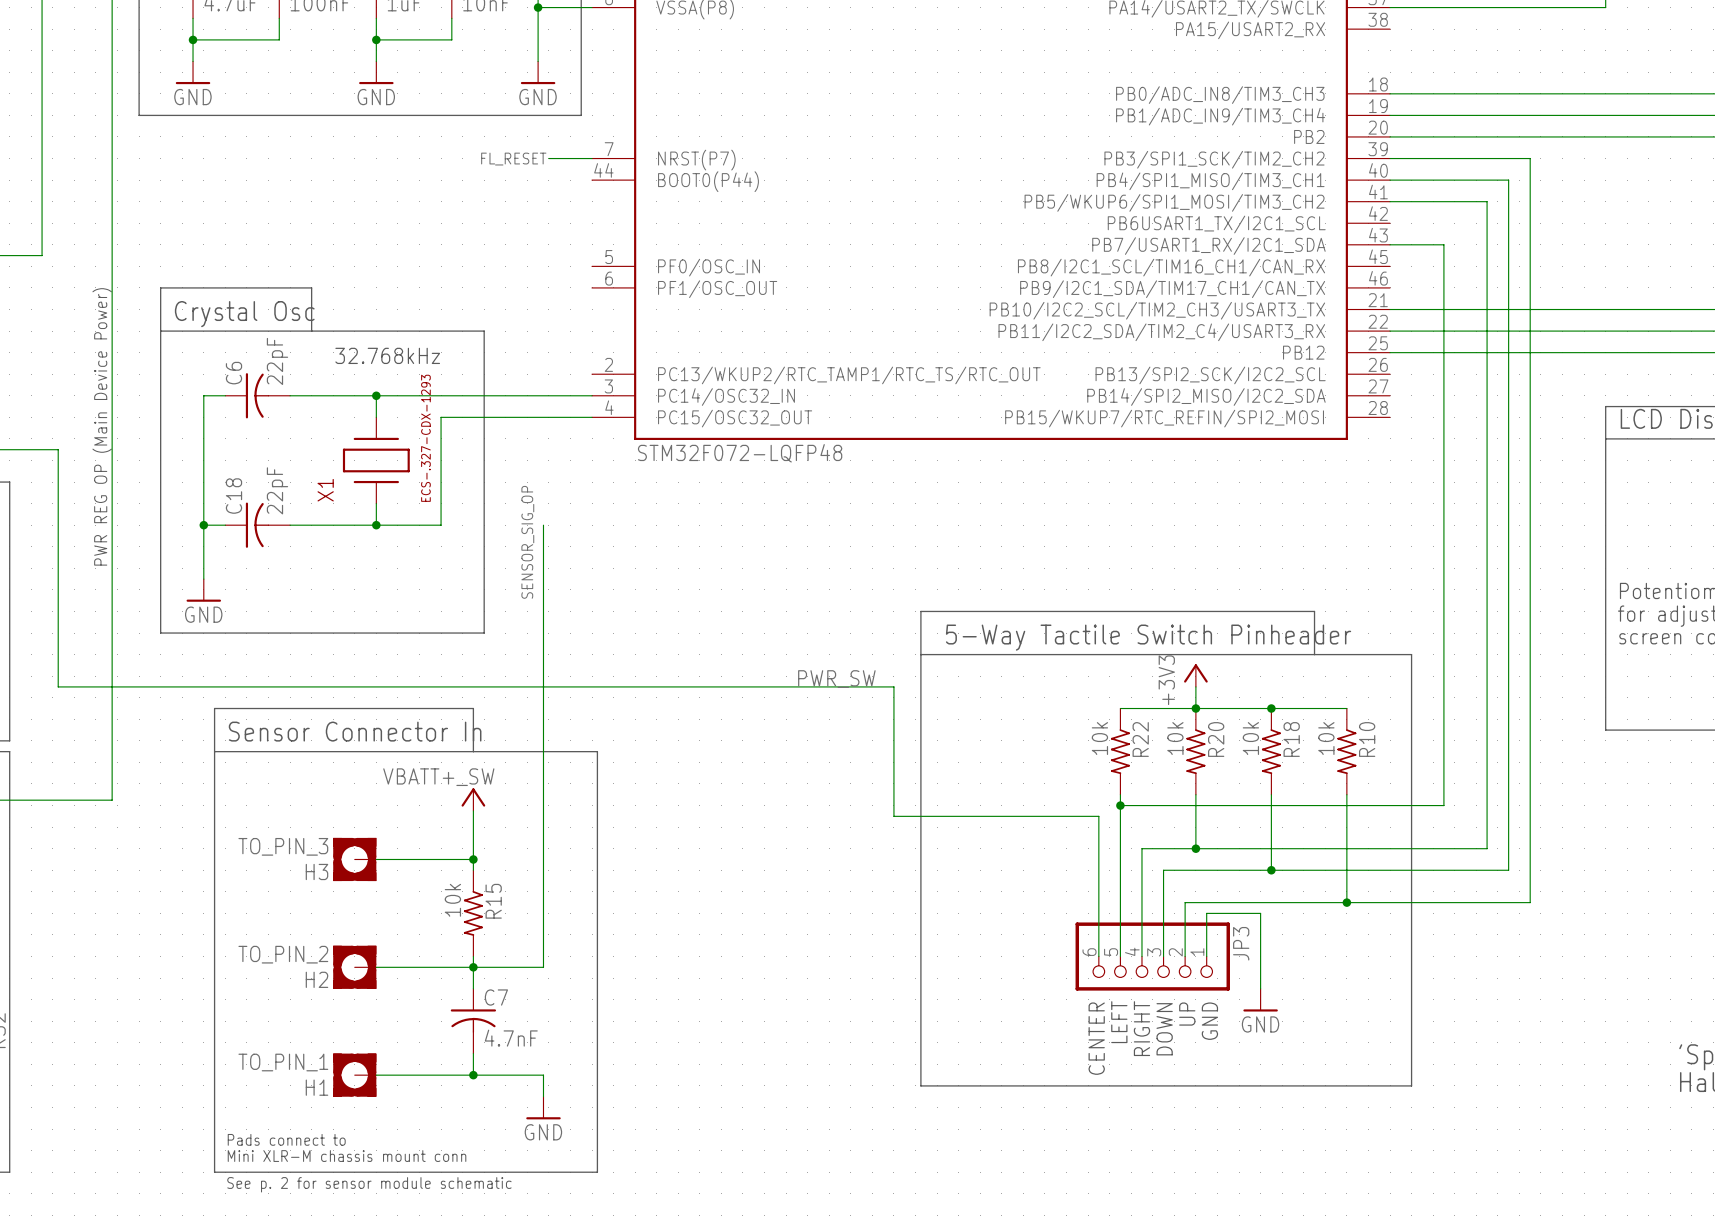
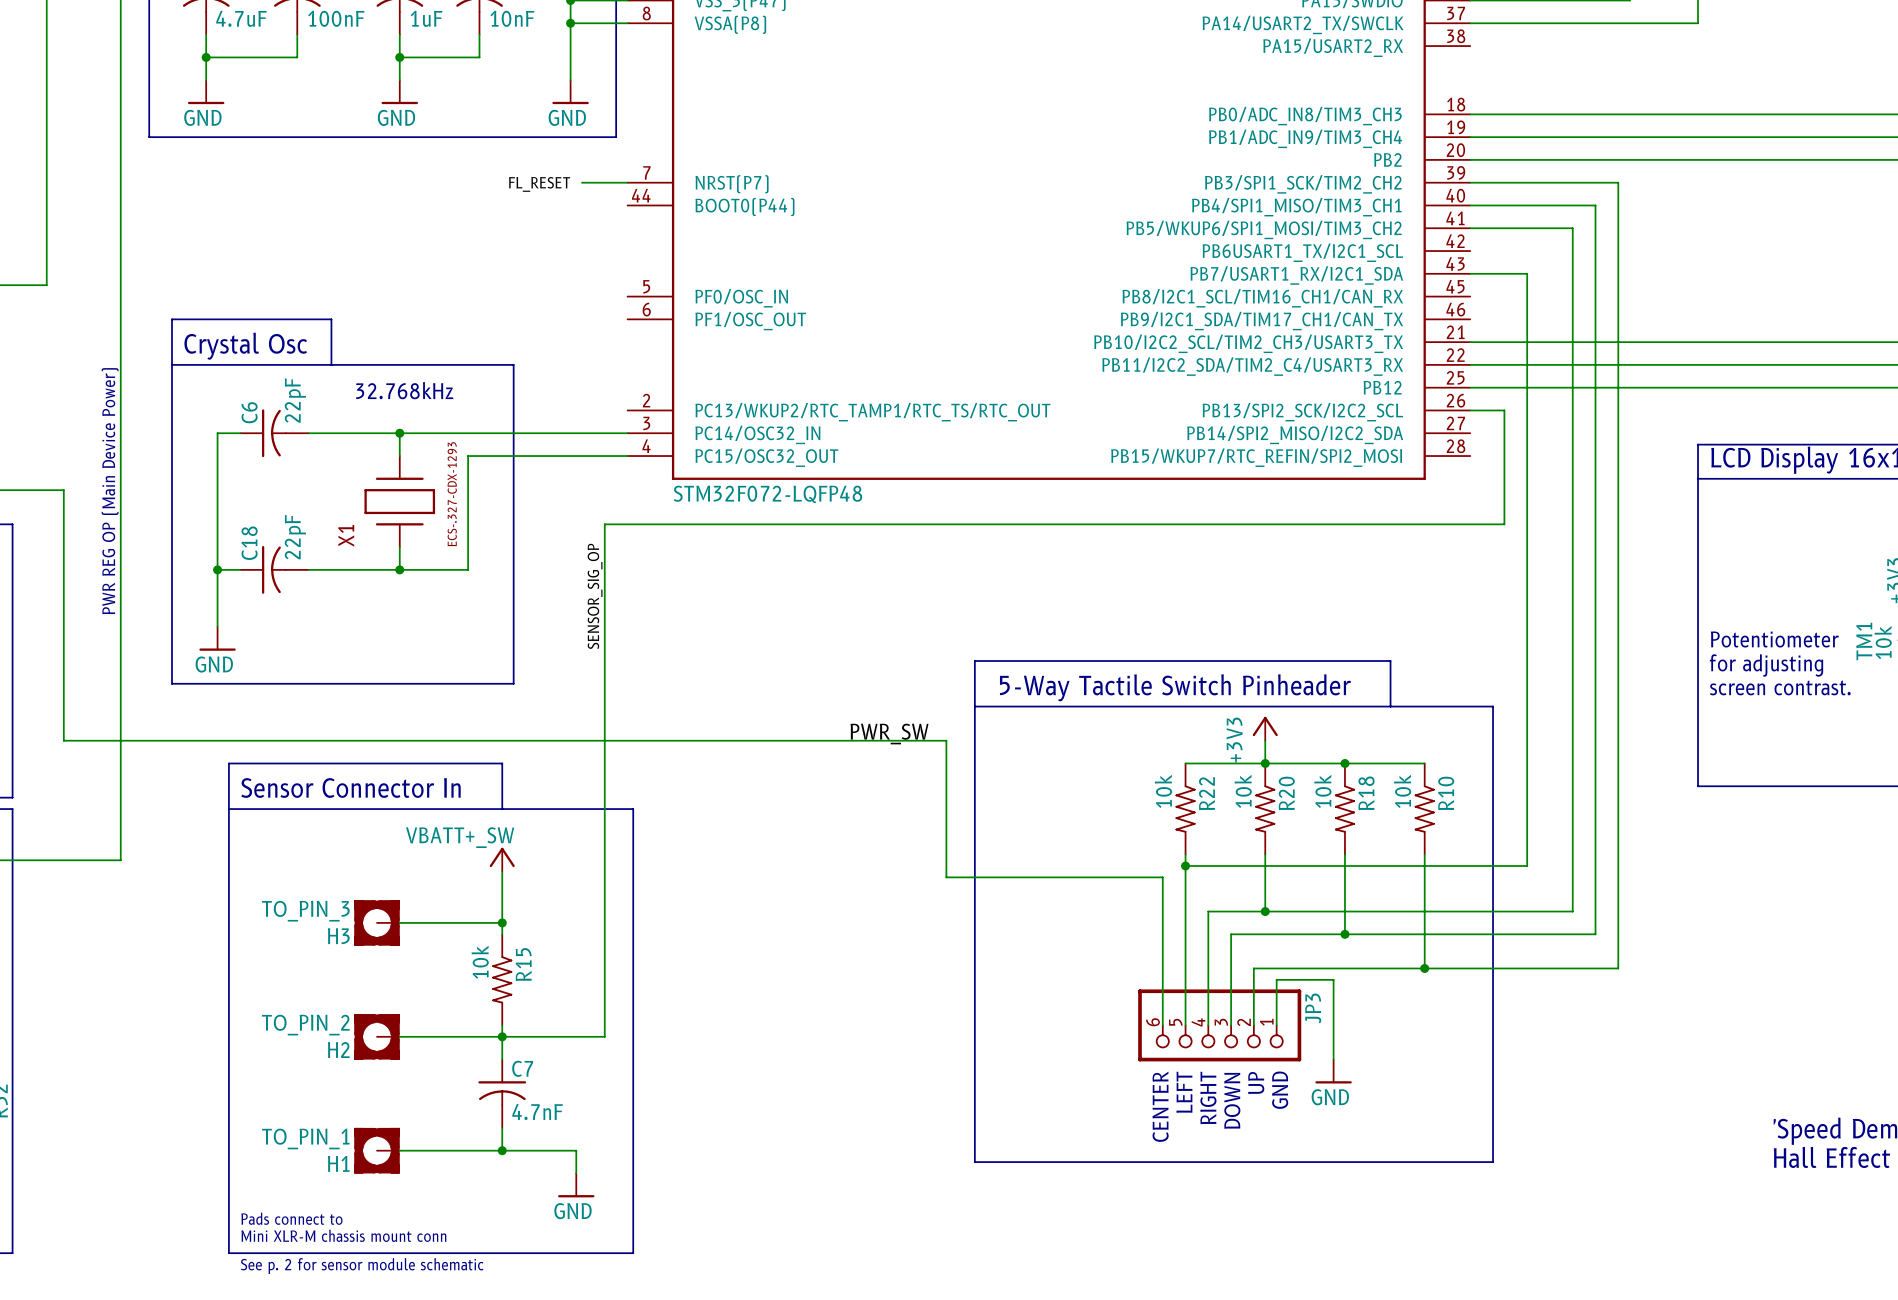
wire: (543, 525) (543, 967) -> (1470, 410) (1504, 410) (1504, 524) (604, 524) (604, 1036) (576, 1036)
label position: SENSOR_SIG_OP (527, 542) -> SENSOR_SIG_OP (595, 596)

